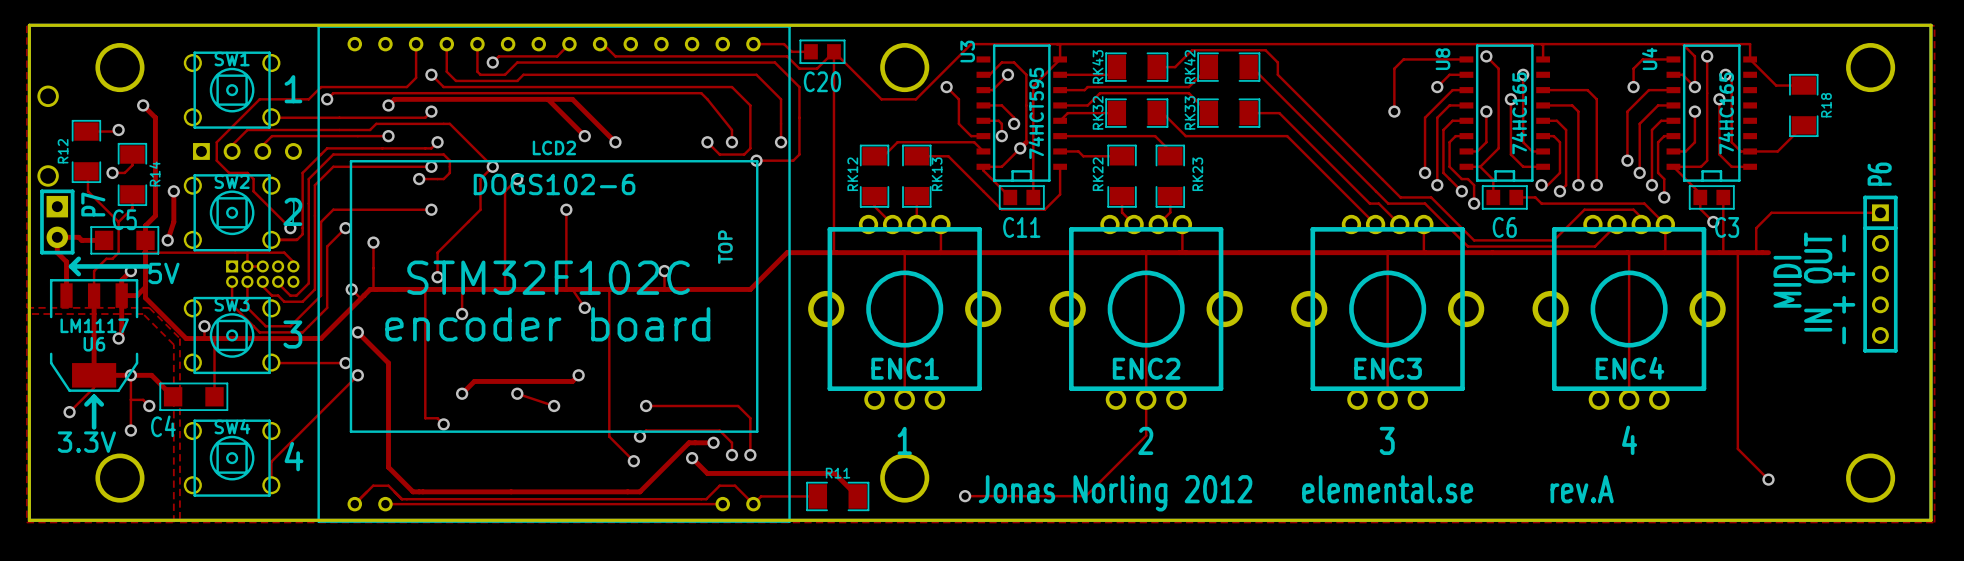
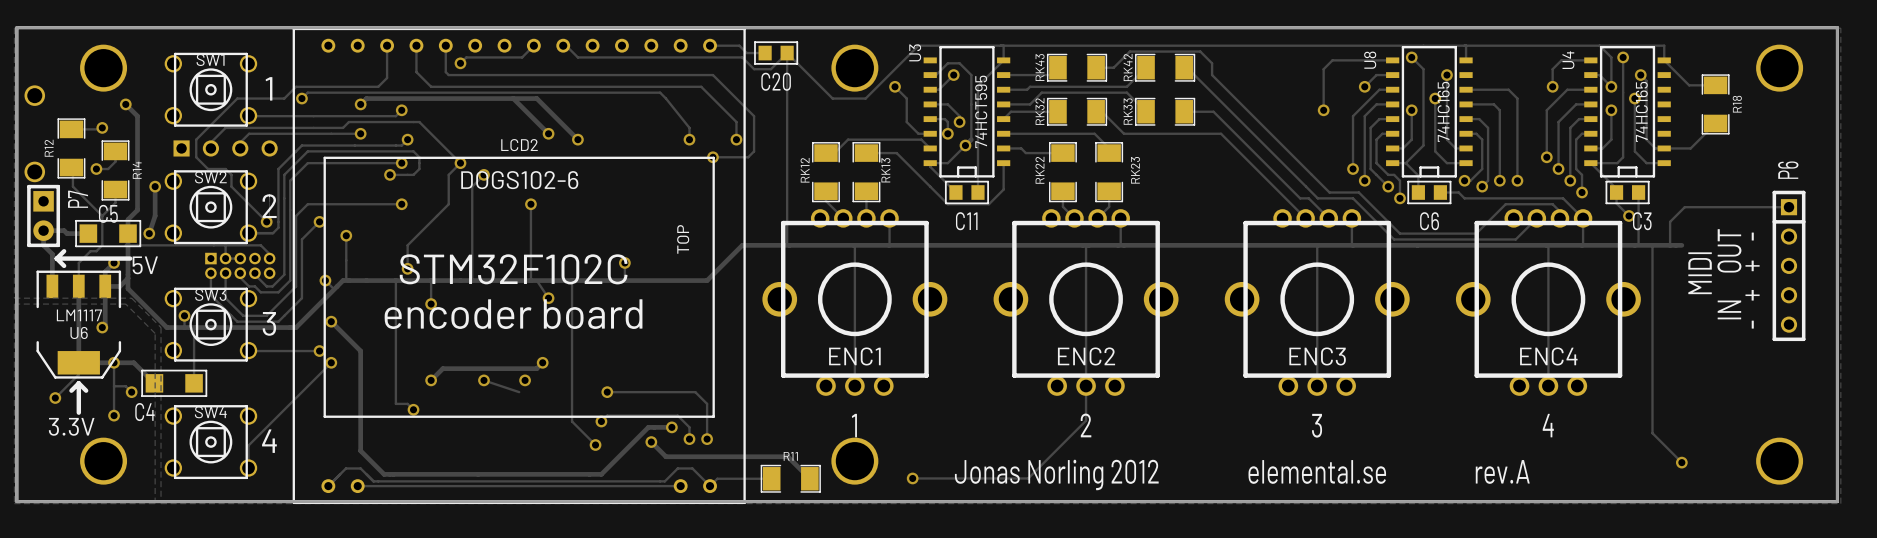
track: (431, 74) (443, 87) (462, 87) -> (425, 80) (431, 86)
via: (431, 74) -> none
track: (505, 74) (517, 62) (774, 62) (799, 87) (799, 117) -> none
track: (523, 74) (517, 80) (455, 80) -> (489, 75) (472, 75)
track: (731, 87) (750, 105) (750, 148) (744, 154) (719, 154) (707, 142) -> (689, 86) (701, 86) (736, 122)
track: (781, 99) (781, 123) -> (736, 98) (754, 116)
via: (707, 142) -> none
via position: (554, 406) -> (525, 380)

